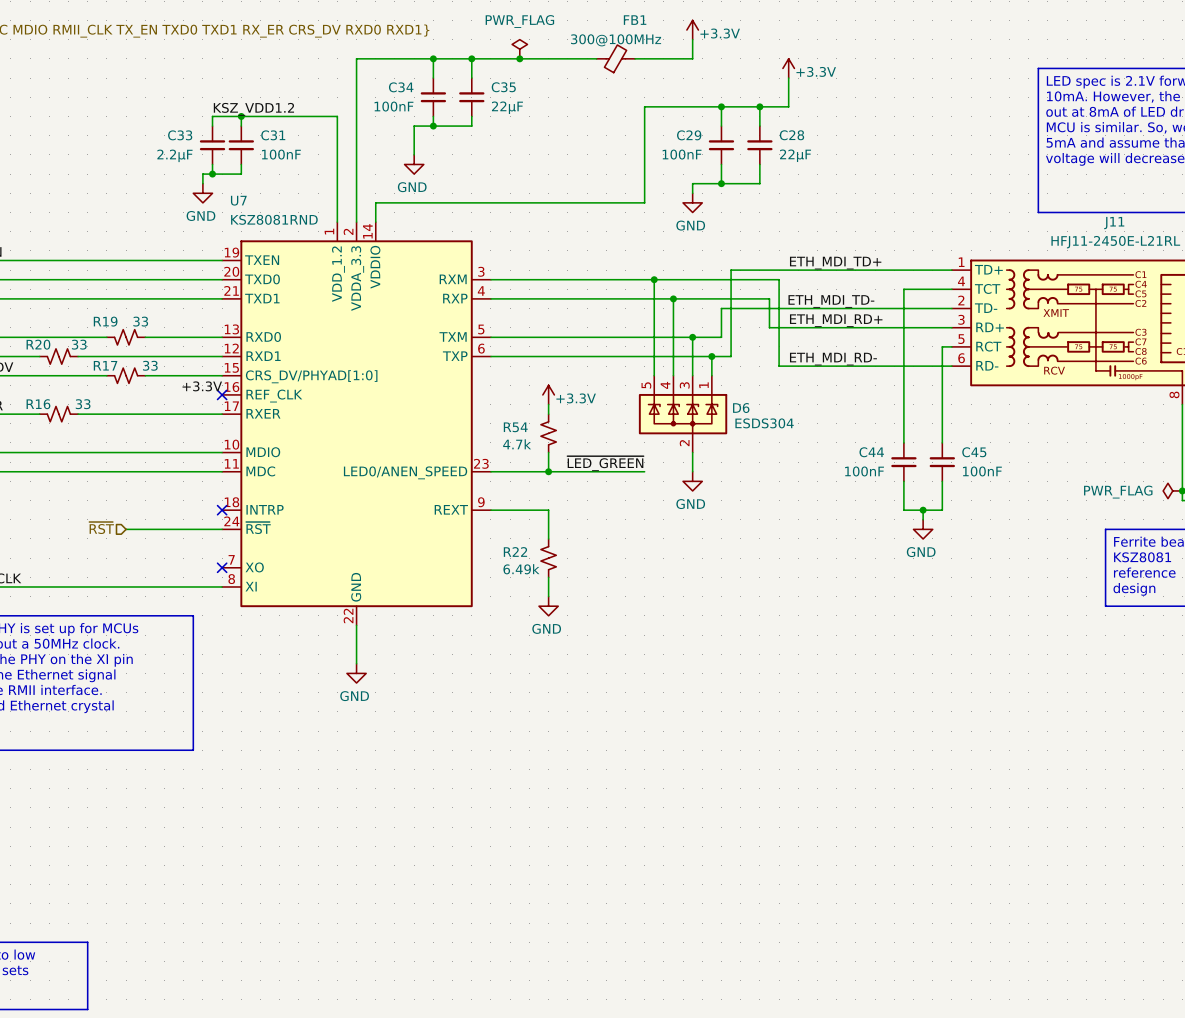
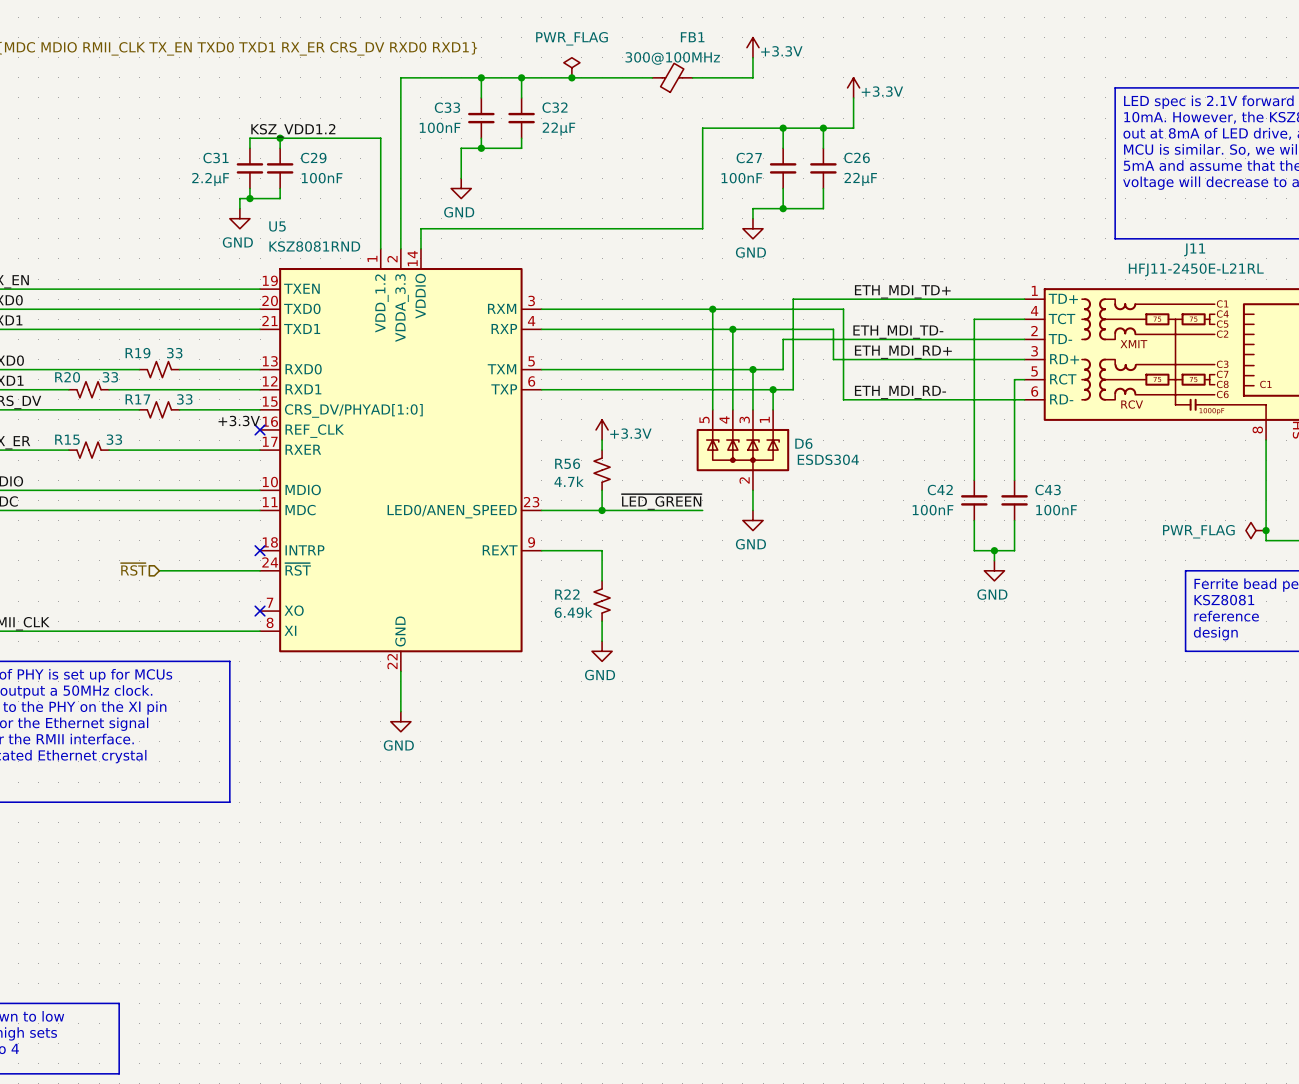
C34 name: C34 (401, 87) -> C33 (447, 107)
C35 name: C35 (503, 87) -> C32 (555, 107)
C33 name: C33 (180, 135) -> C31 (215, 158)
C31 name: C31 (273, 135) -> C29 (313, 158)
C29 name: C29 (689, 135) -> C27 (749, 158)
C28 name: C28 (791, 135) -> C26 (857, 157)
U7 name: U7 (238, 200) -> U5 (277, 226)
R16 name: R16 (38, 404) -> R15 (67, 439)
R54 name: R54 (515, 427) -> R56 (567, 463)
C44 name: C44 (871, 452) -> C42 (940, 490)
C45 name: C45 (974, 452) -> C43 (1048, 490)

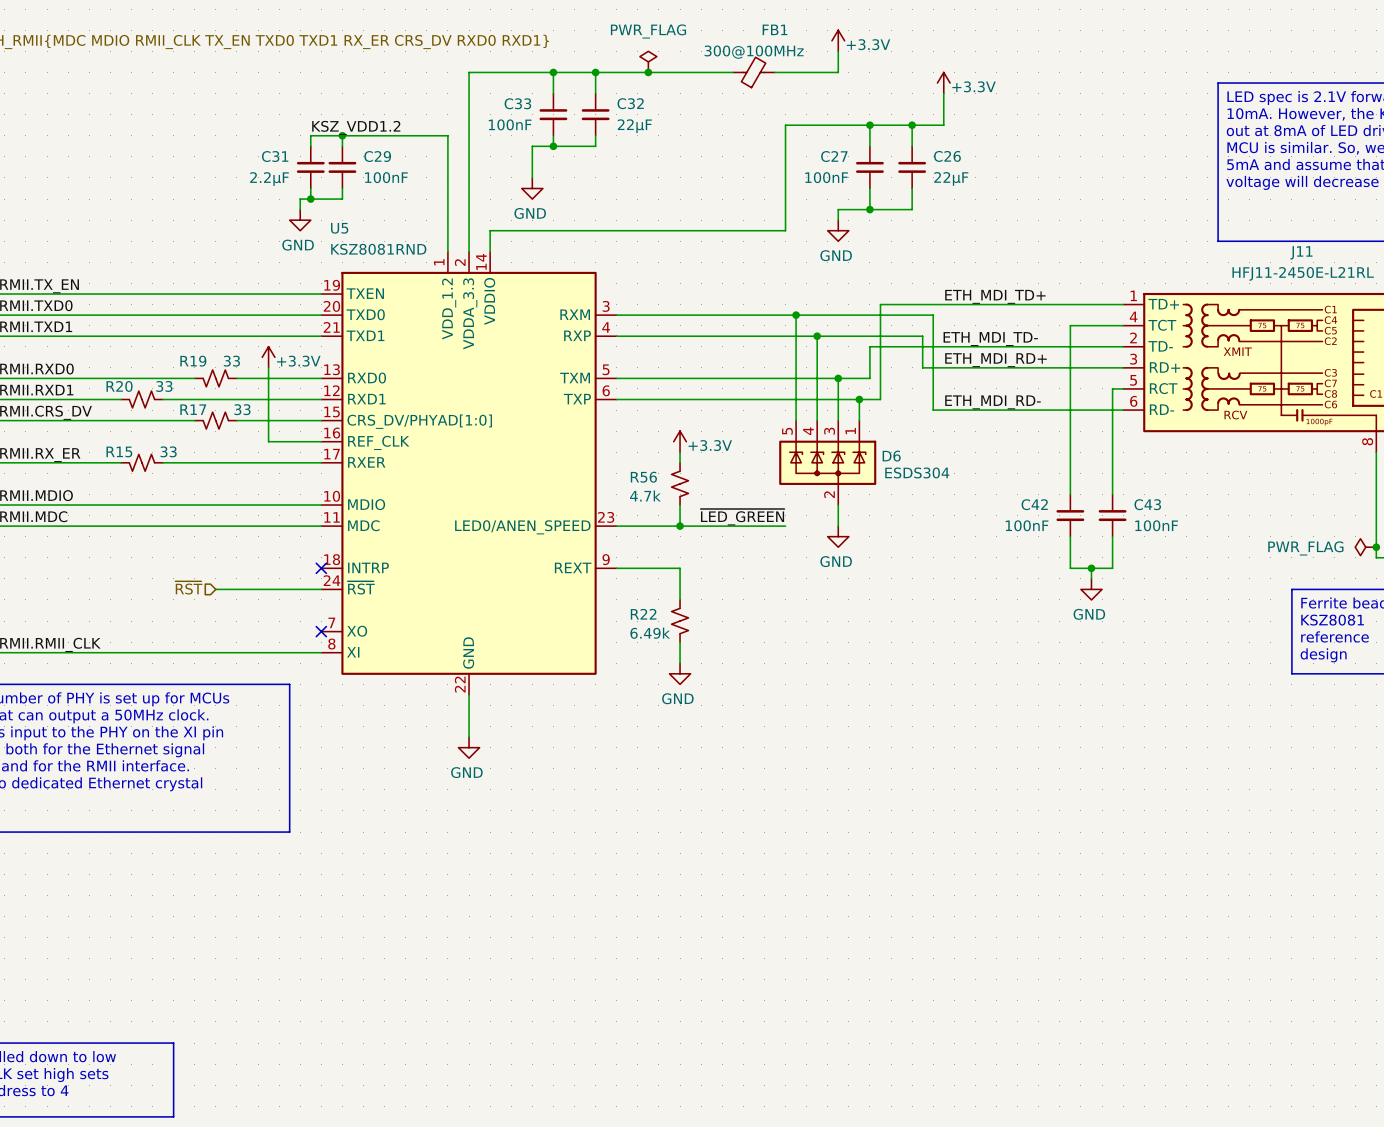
power symbol: none -> +3.3V (268, 357)
wire: none -> (268, 367) (268, 441) (321, 441)
label: +3.3V (239, 421) -> none
no-connect mark: (260, 429) -> none

